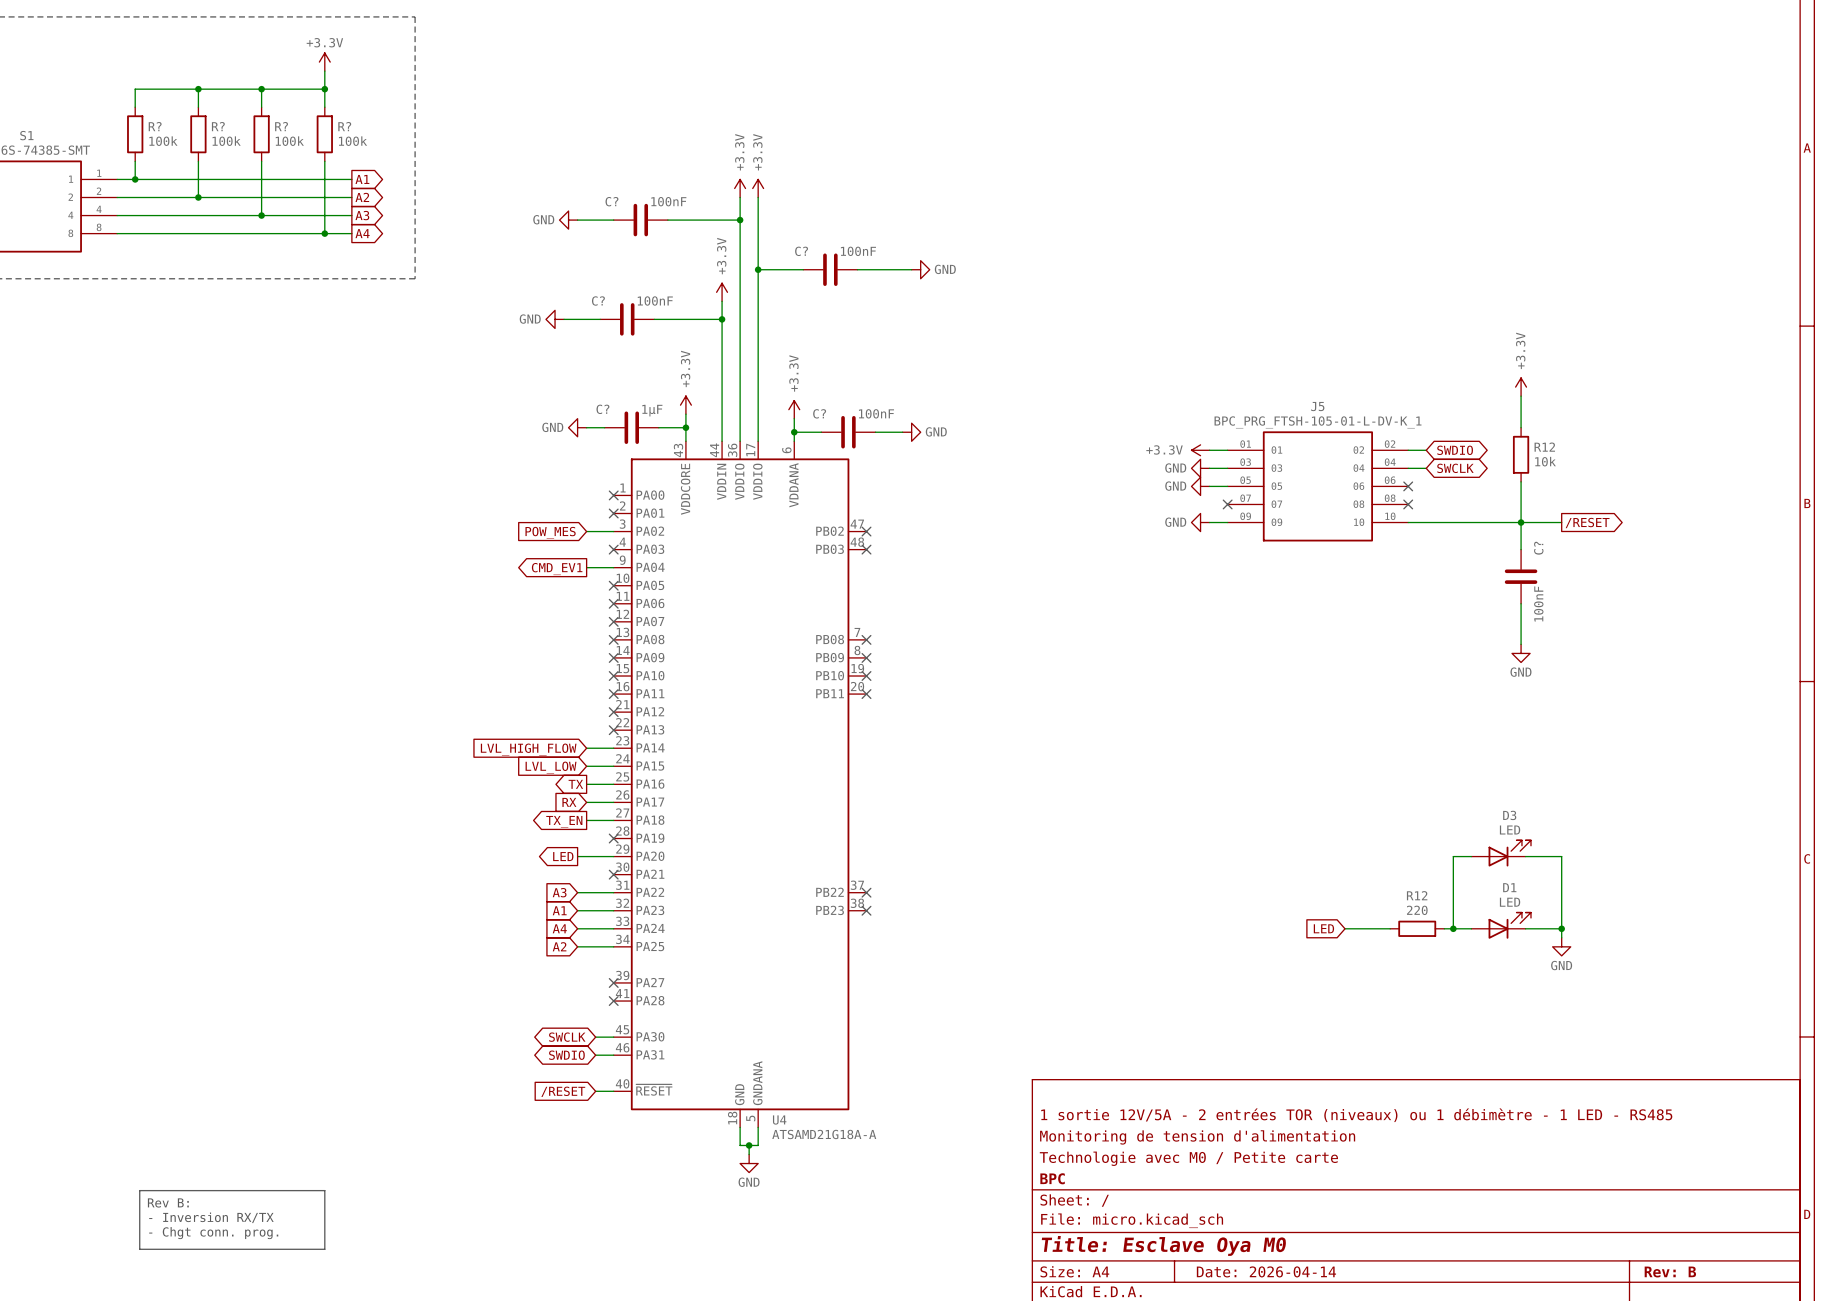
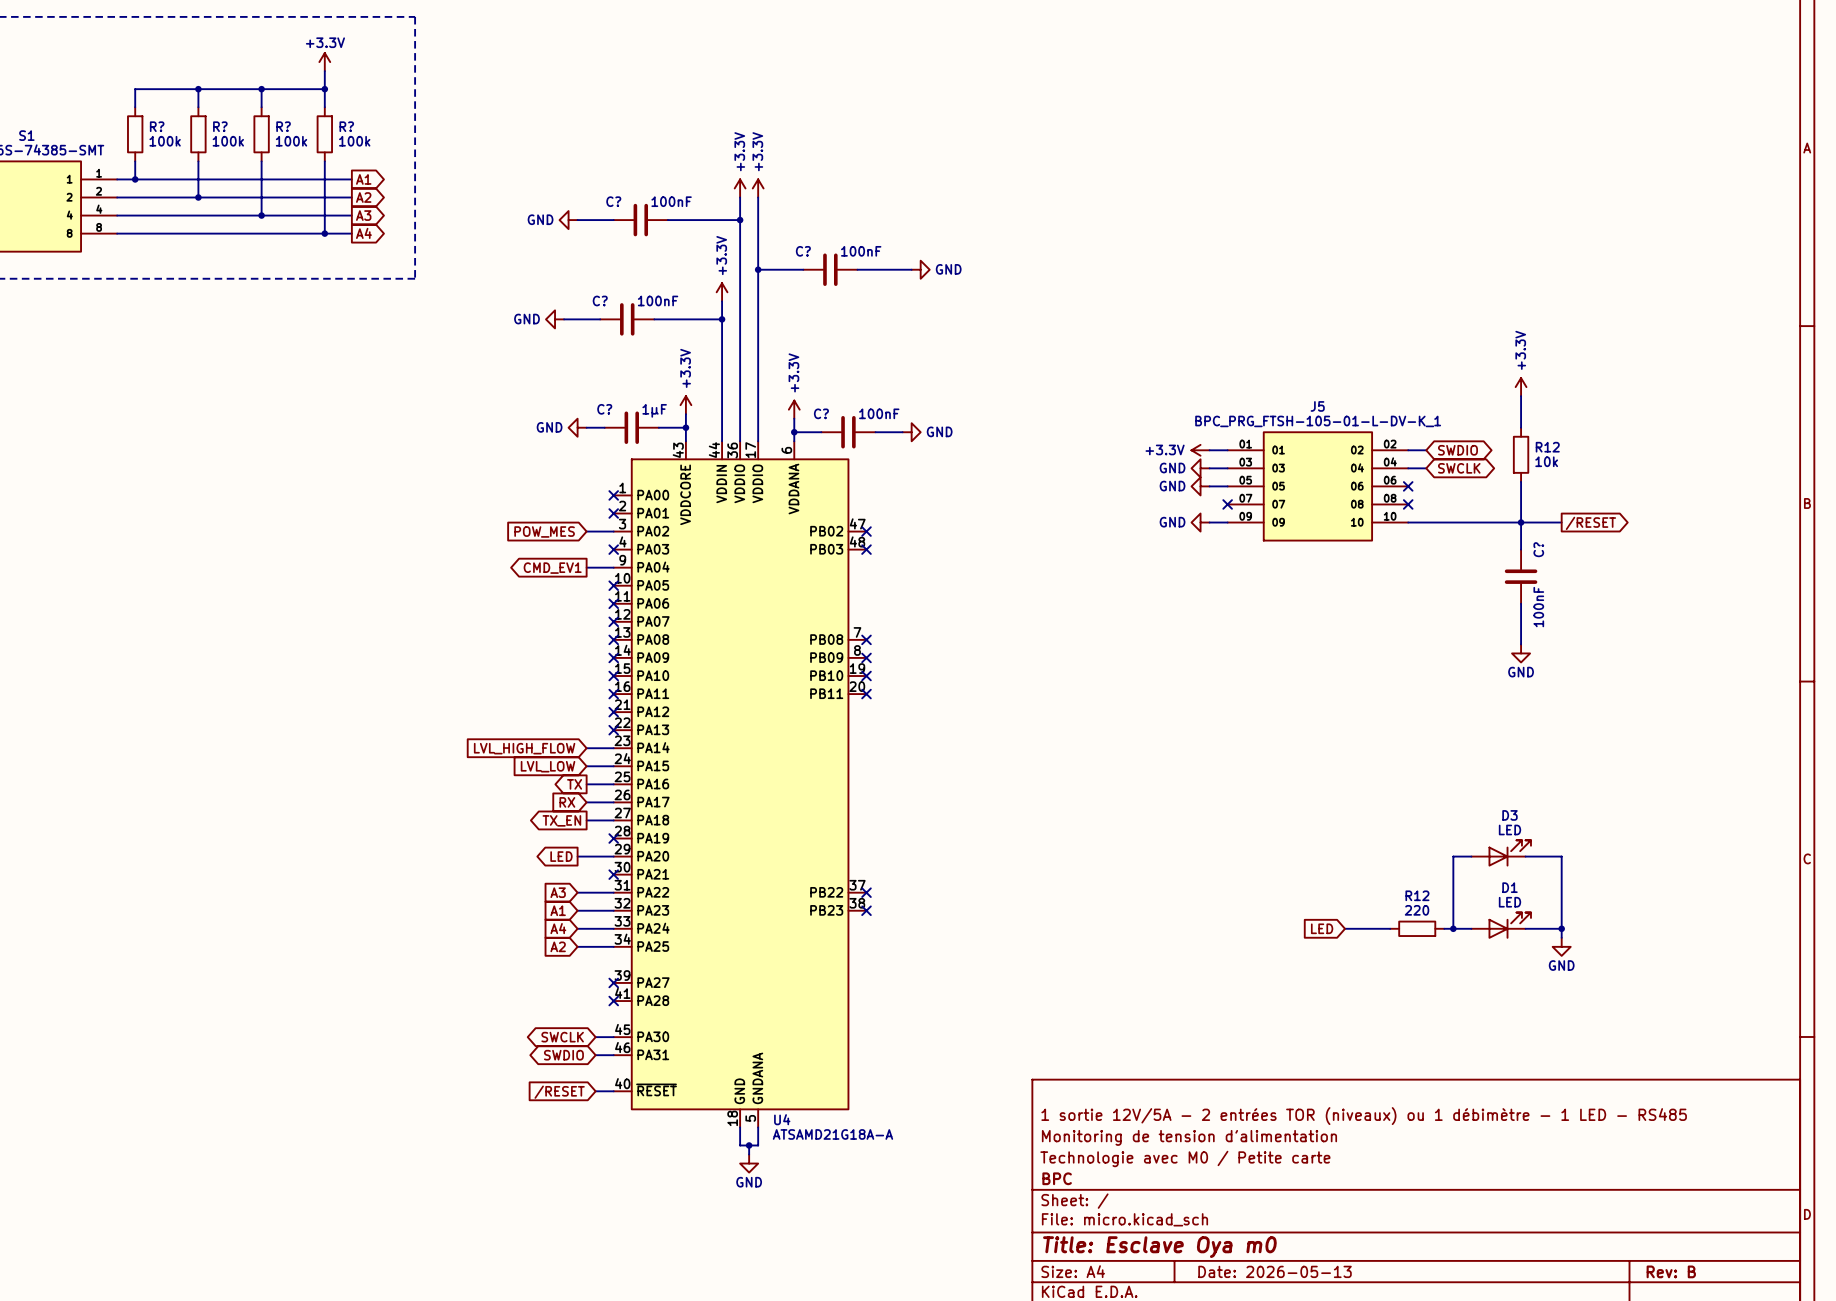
line: (139, 1190) (324, 1190) (324, 1249) (139, 1249) (139, 1190) -> none
text: Rev B: (168, 1202) -> none
text: - Inversion RX/TX (211, 1217) -> none
text: - Chgt conn. prog. (213, 1233) -> none
title block: Title: Esclave Oya M0 (1163, 1245) -> Title: Esclave Oya m0 (1159, 1247)
title block: Date: 2026-04-14 (1266, 1271) -> Date: 2026-05-13 (1275, 1271)

